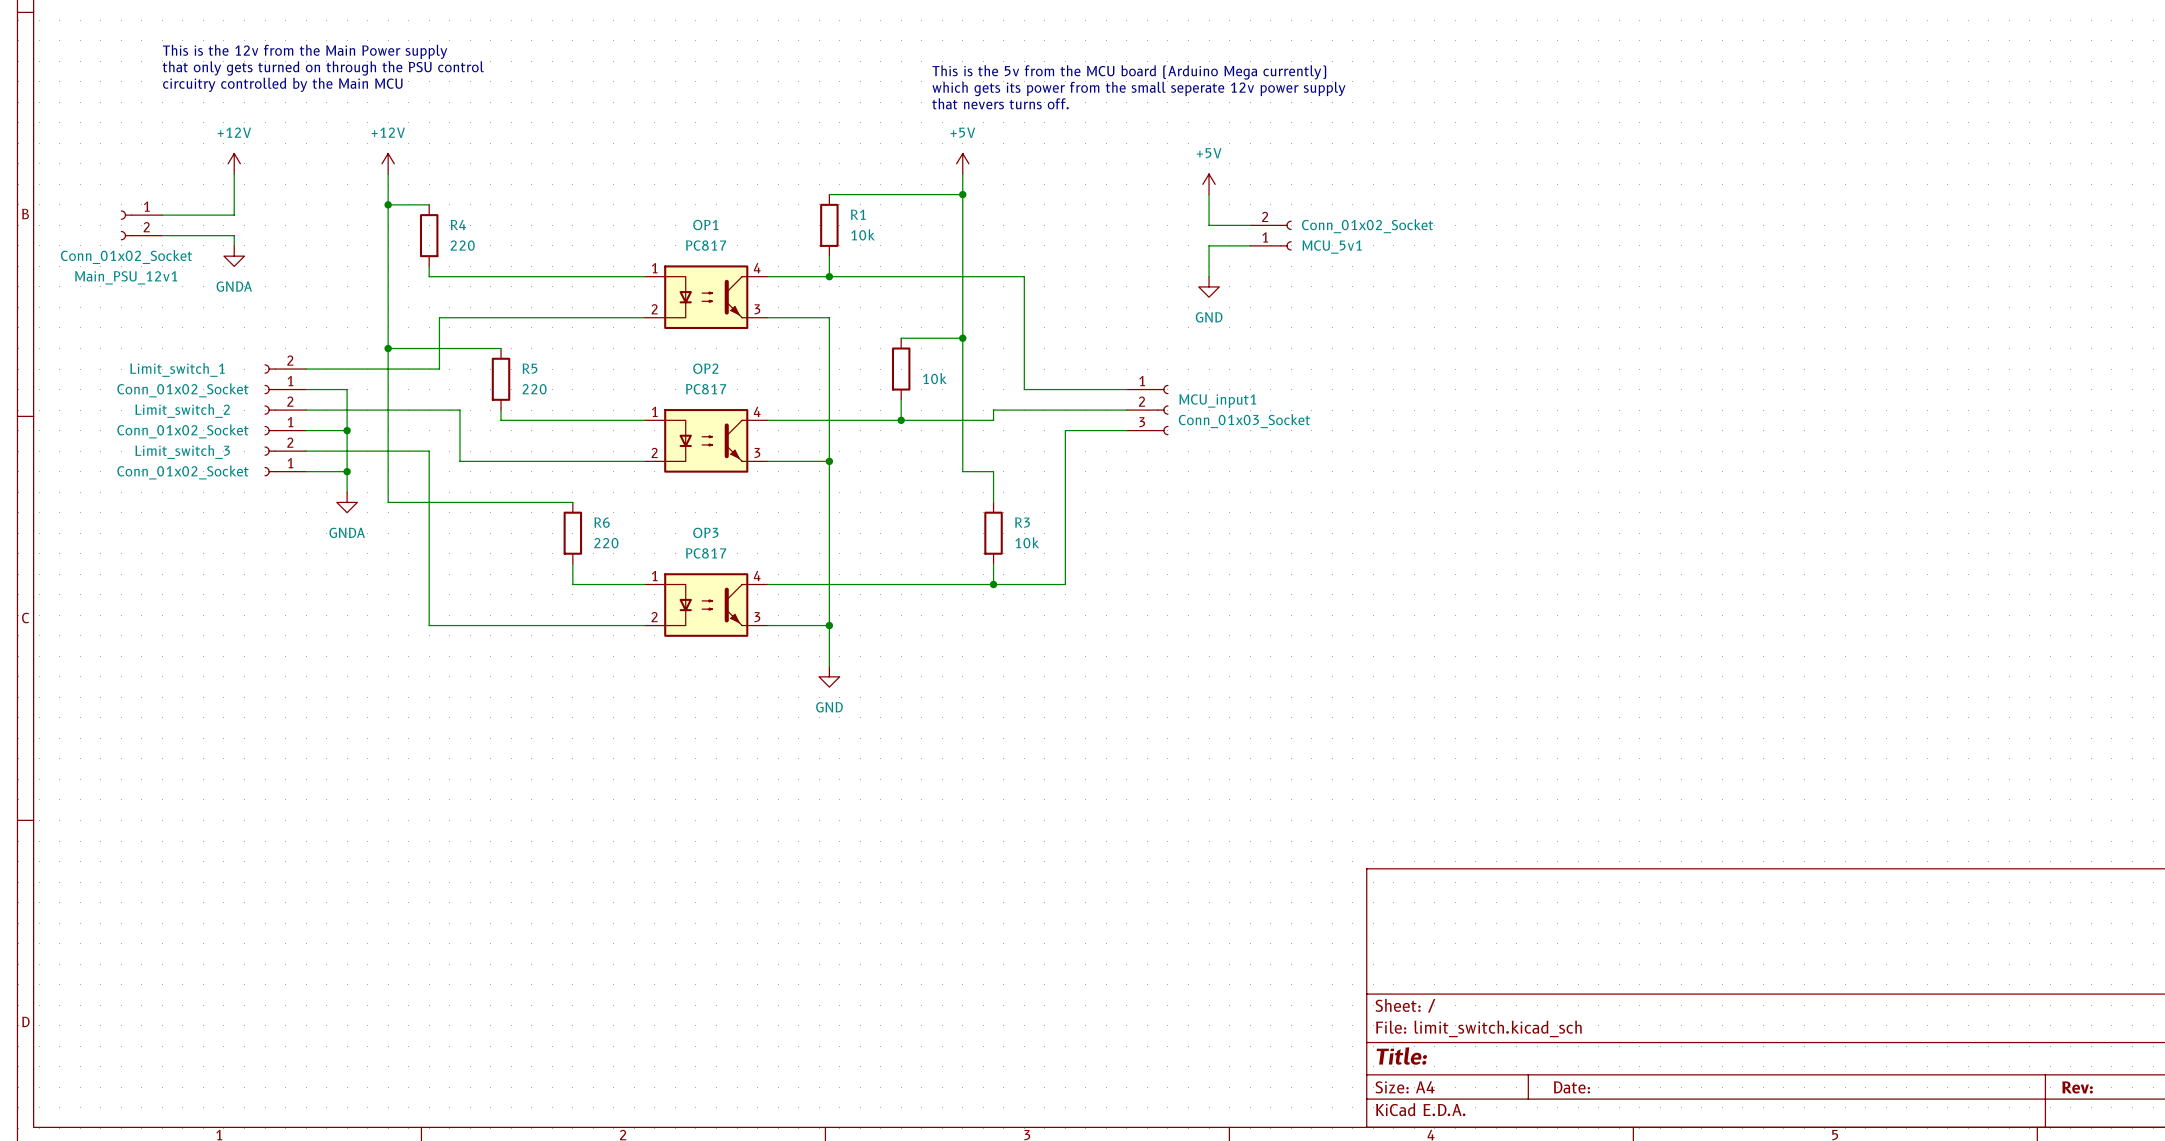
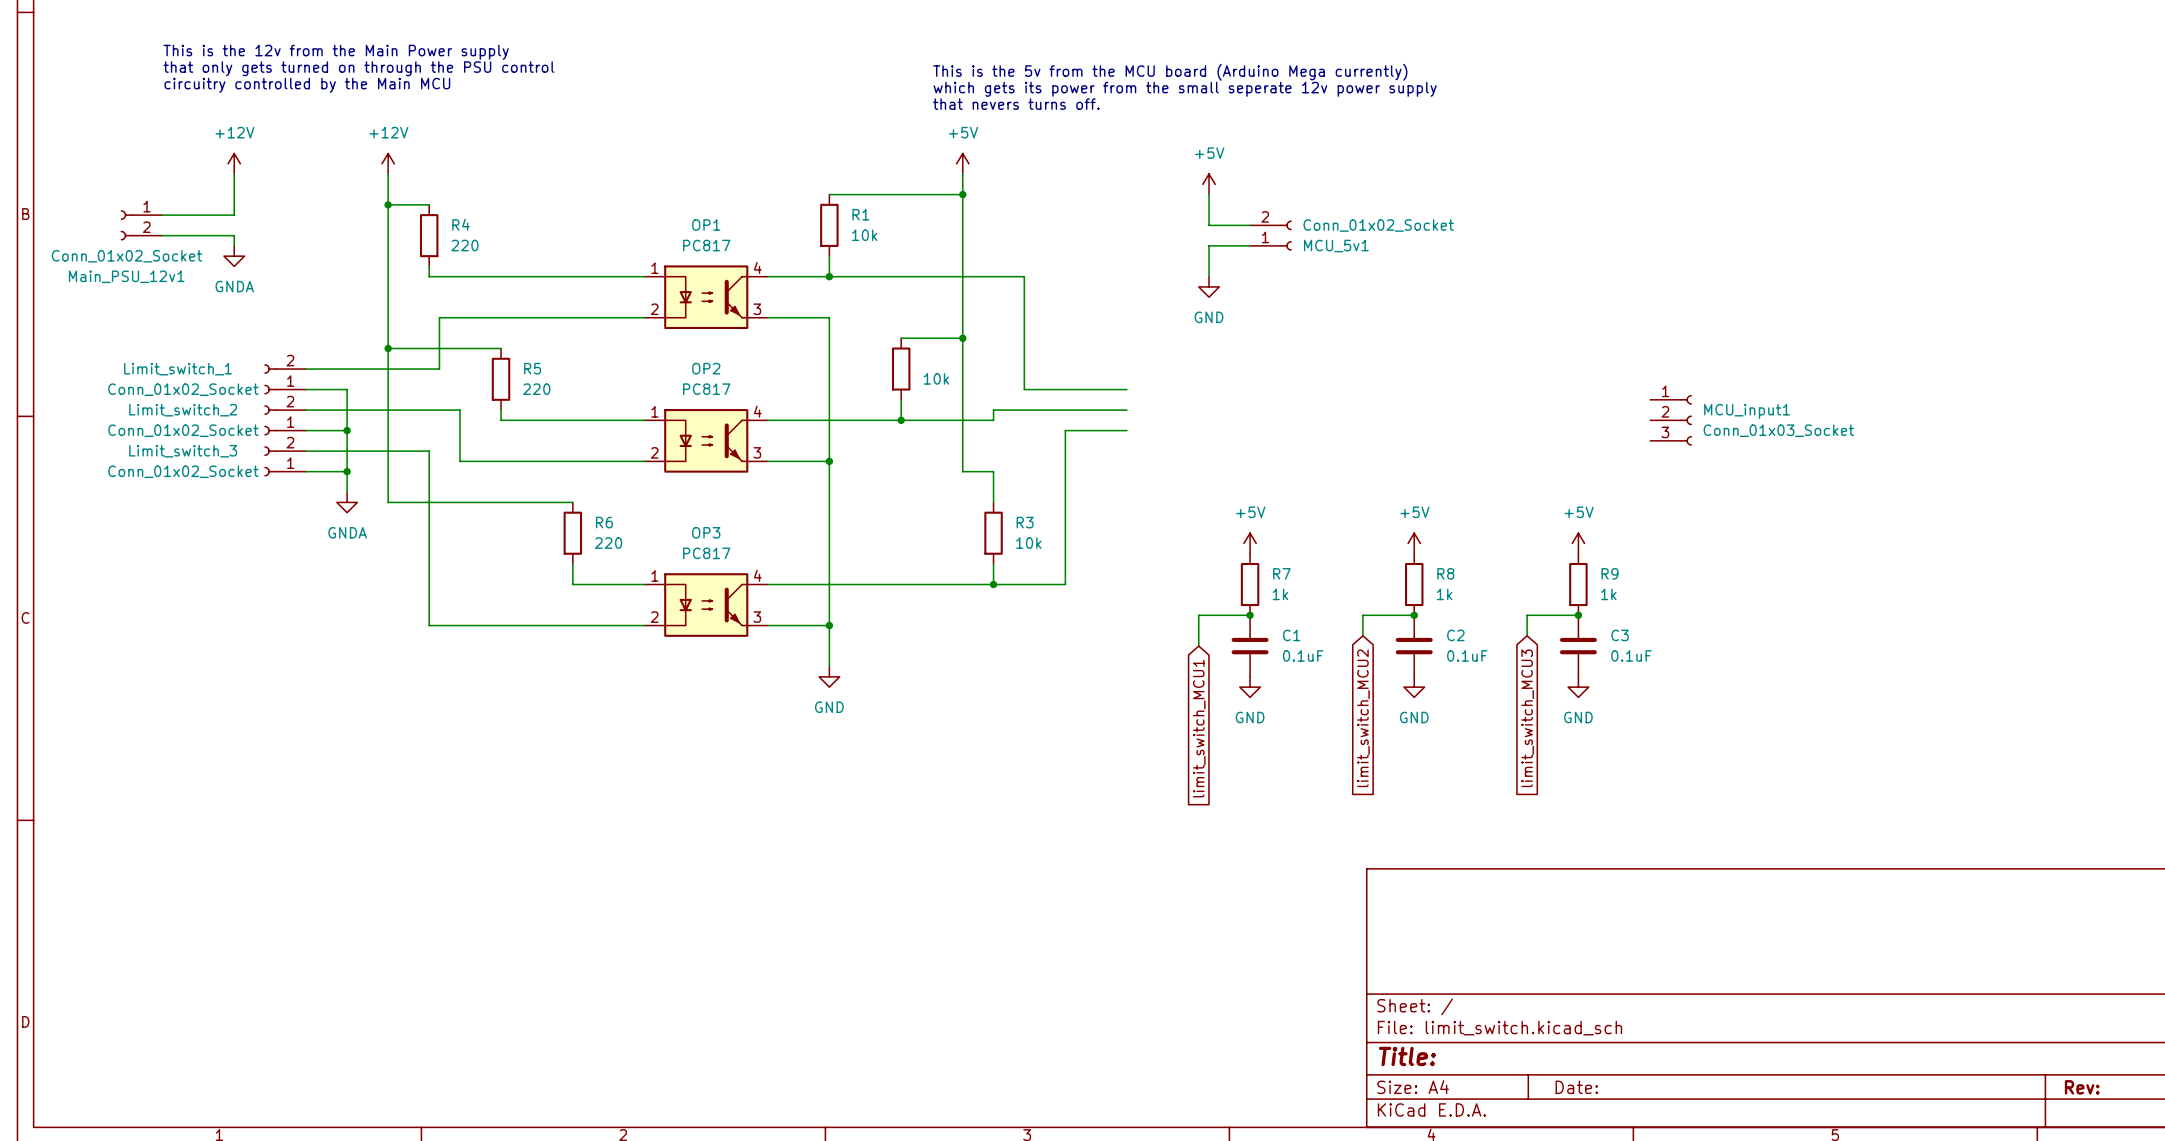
MCU_input1 position: (1147, 410) -> (1671, 420)
power symbol: none -> +5V (1250, 543)
power symbol: none -> +5V (1414, 543)
power symbol: none -> +5V (1578, 543)
R7: none -> 1k (1250, 584)
R8: none -> 1k (1414, 584)
R9: none -> 1k (1578, 584)
wire: none -> (1250, 615) (1198, 615) (1198, 646)
junction: none -> (1250, 615)
wire: none -> (1414, 615) (1362, 615) (1362, 635)
junction: none -> (1414, 615)
wire: none -> (1578, 615) (1527, 615) (1527, 635)
junction: none -> (1578, 615)
C1: none -> 0.1uF (1250, 646)
C2: none -> 0.1uF (1414, 646)
C3: none -> 0.1uF (1578, 646)
power symbol: none -> GND (1250, 687)
power symbol: none -> GND (1414, 687)
power symbol: none -> GND (1578, 687)
global label: none -> limit_switch_MCU2 (1363, 718)
global label: none -> limit_switch_MCU3 (1527, 718)
global label: none -> limit_switch_MCU1 (1199, 728)

